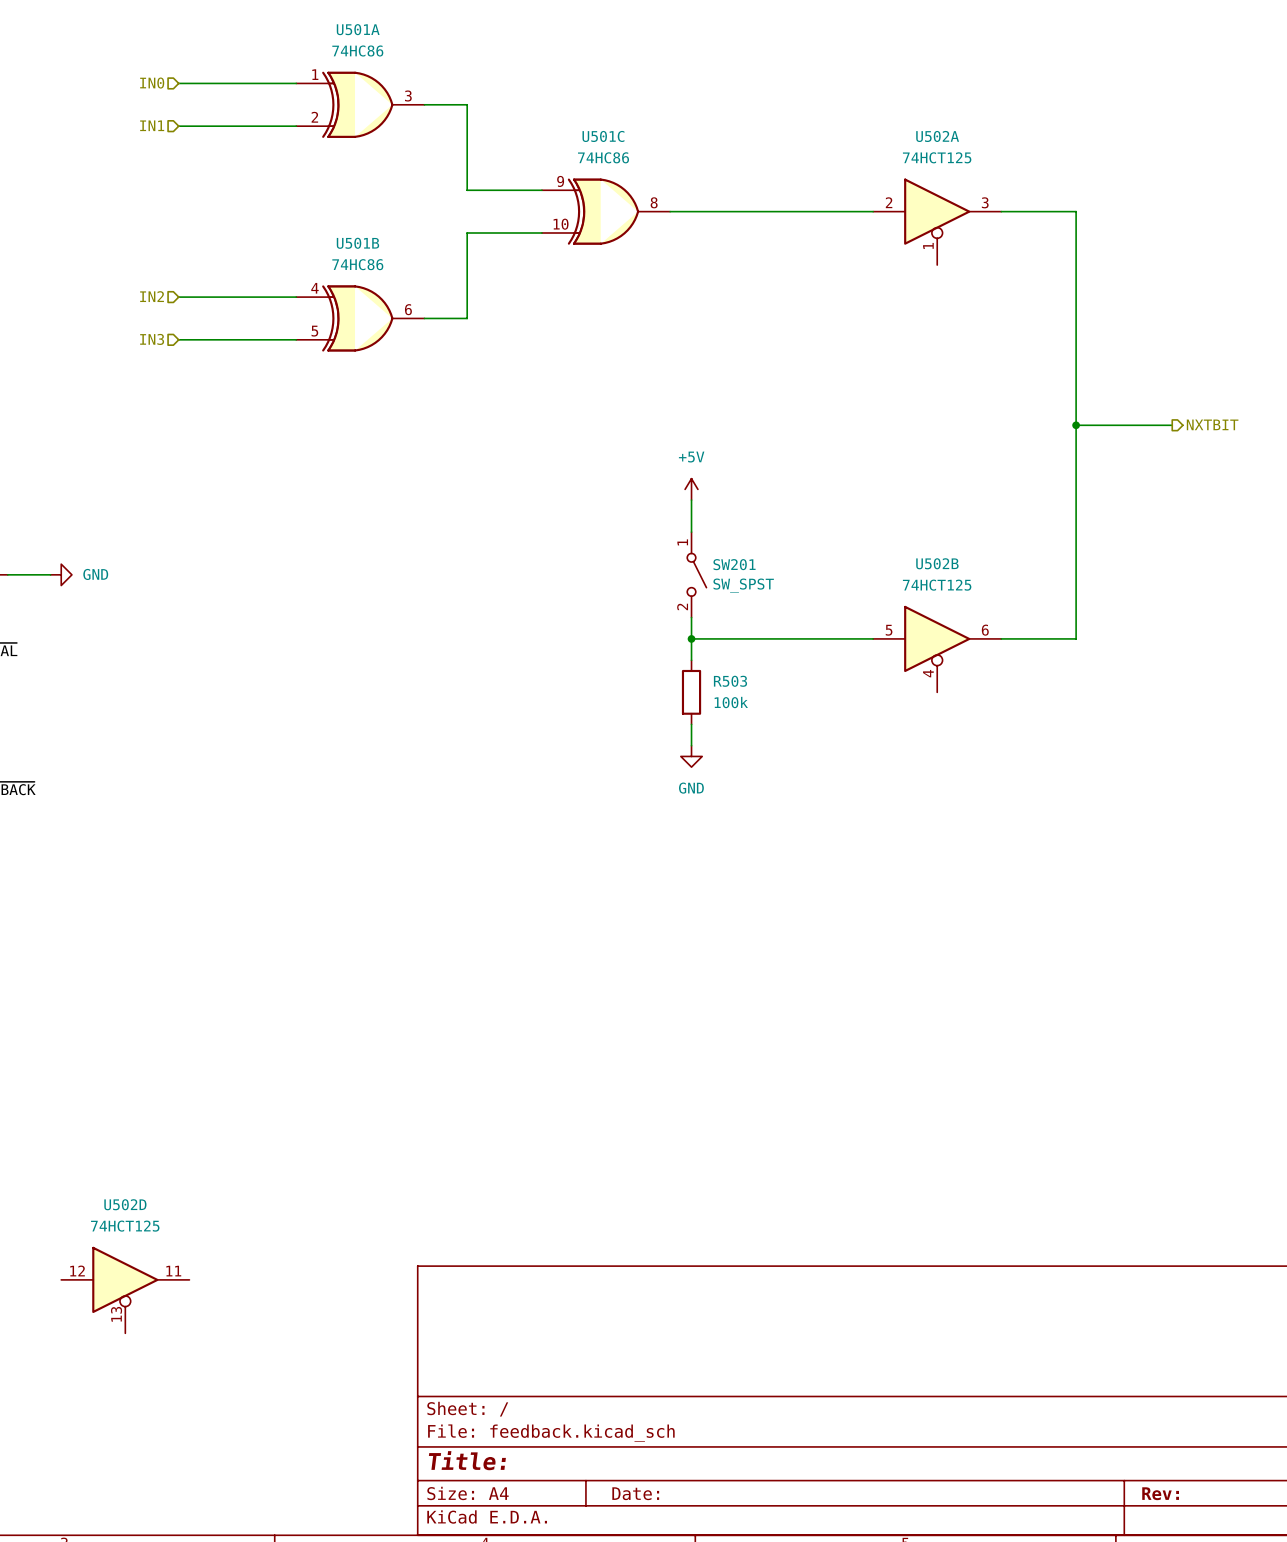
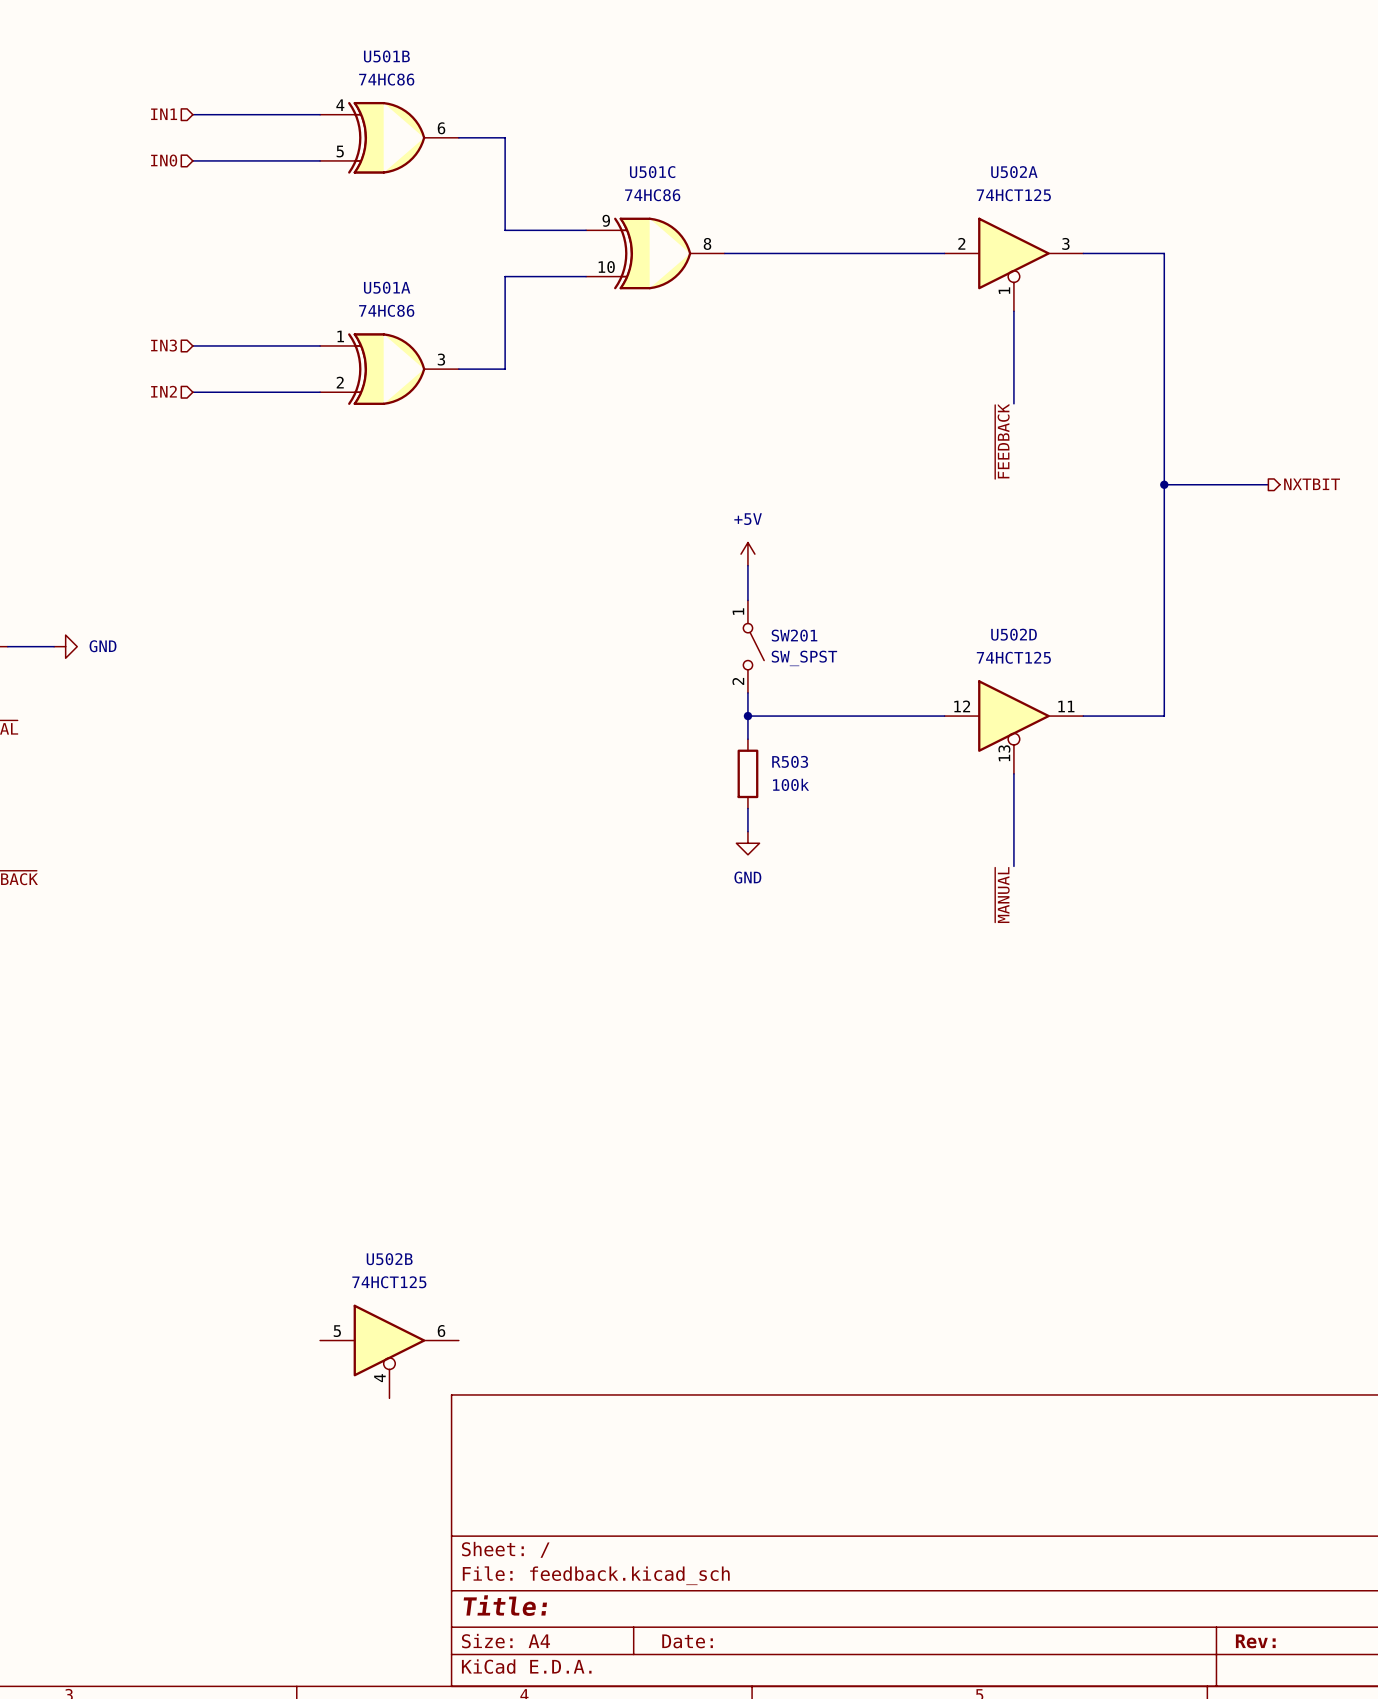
hierarchical label: IN0 (152, 83) -> IN1 (164, 114)
U501A position: (360, 104) -> (389, 369)
hierarchical label: IN1 (152, 125) -> IN0 (164, 160)
wire: none -> (1013, 311) (1013, 403)
hierarchical label: IN2 (152, 296) -> IN3 (164, 345)
U501B position: (360, 318) -> (389, 137)
hierarchical label: IN3 (152, 339) -> IN2 (163, 391)
label: none -> ~{FEEDBACK} (1002, 441)
U502B position: (937, 649) -> (389, 1351)
wire: none -> (1013, 773) (1013, 866)
label: none -> ~{MANUAL} (1002, 895)
U502D position: (125, 1290) -> (1013, 727)

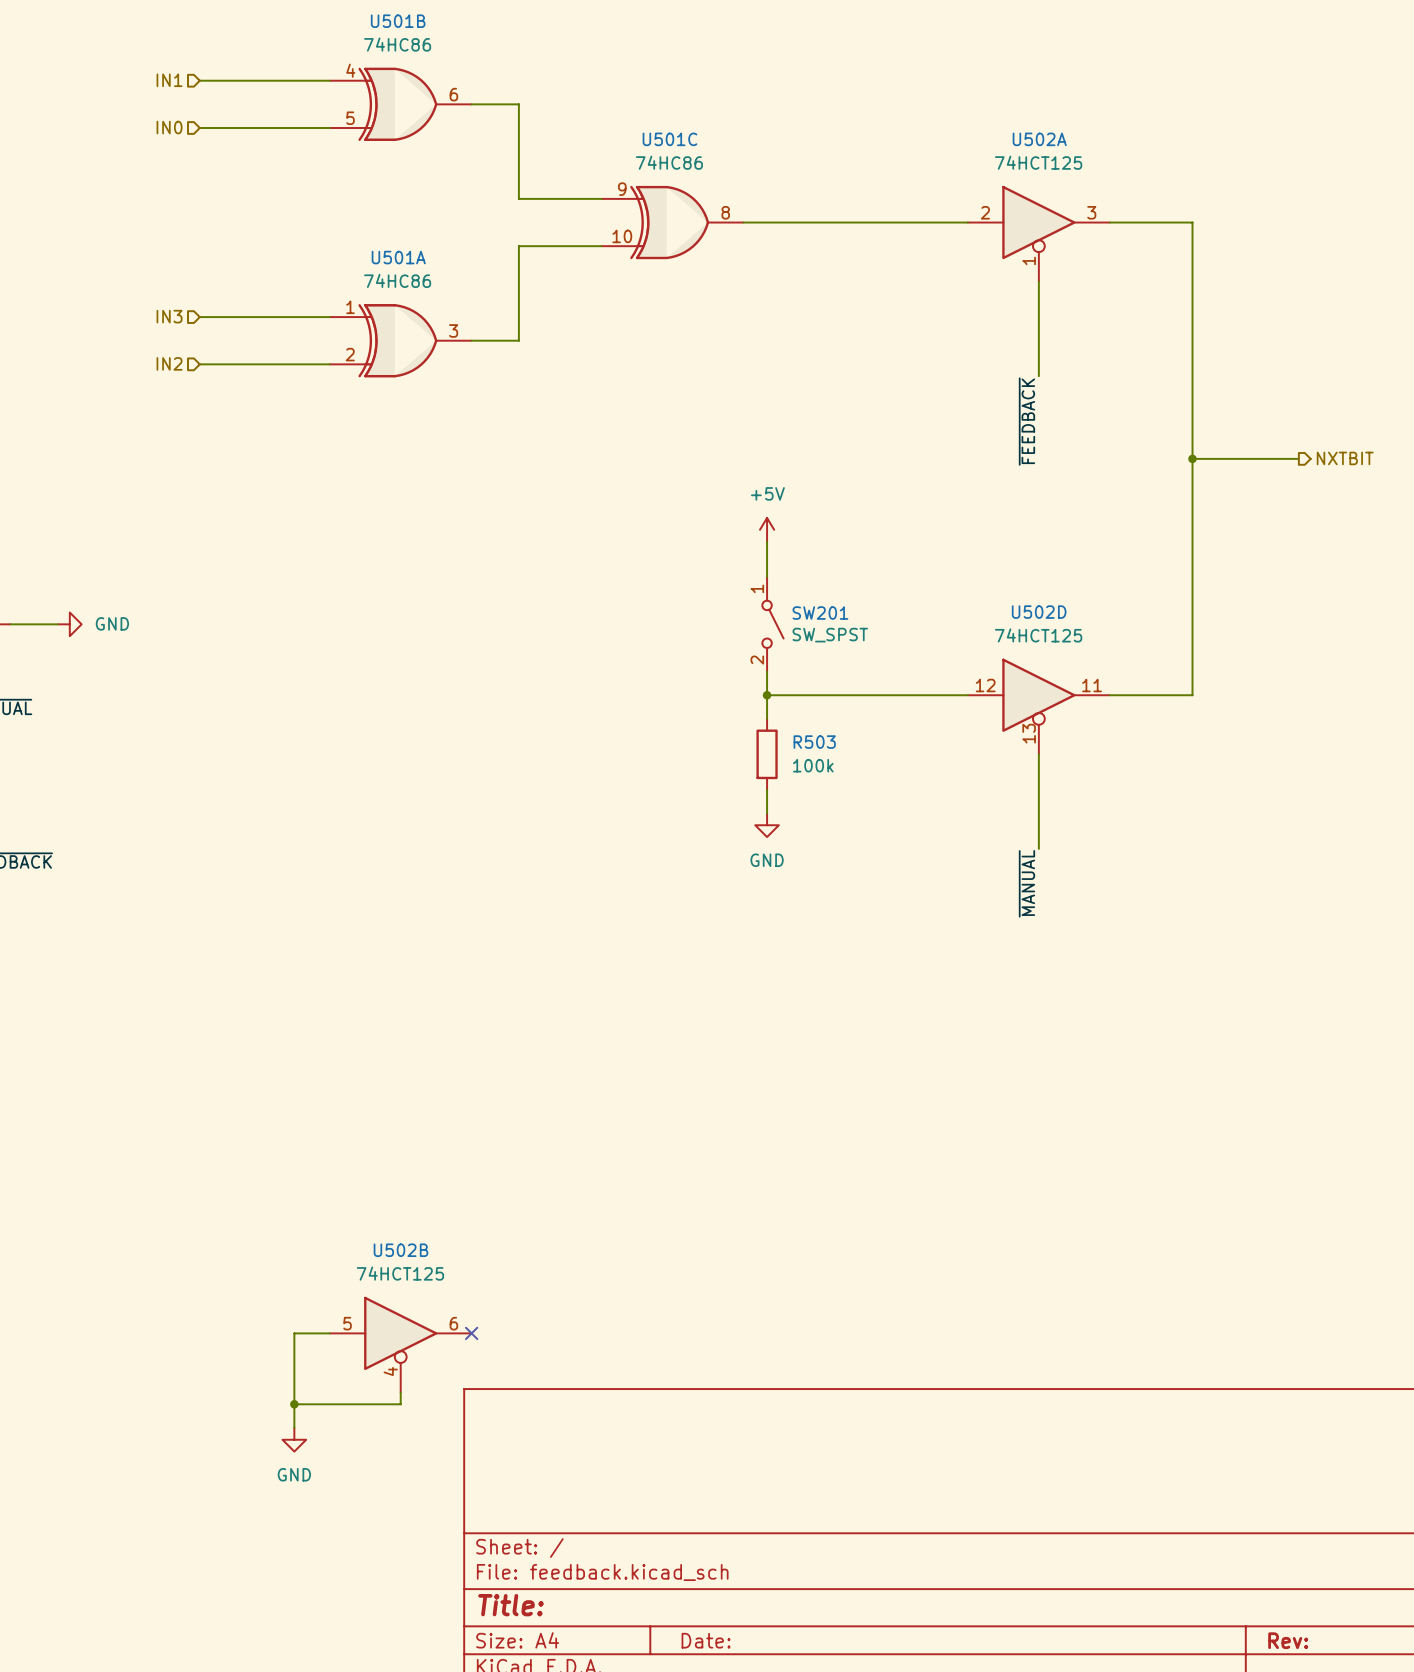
wire: none -> (329, 1333) (294, 1333) (294, 1427)
no-connect mark: none -> (471, 1333)
wire: none -> (400, 1392) (400, 1404) (294, 1404)
junction: none -> (294, 1404)
power symbol: none -> GND (294, 1439)

